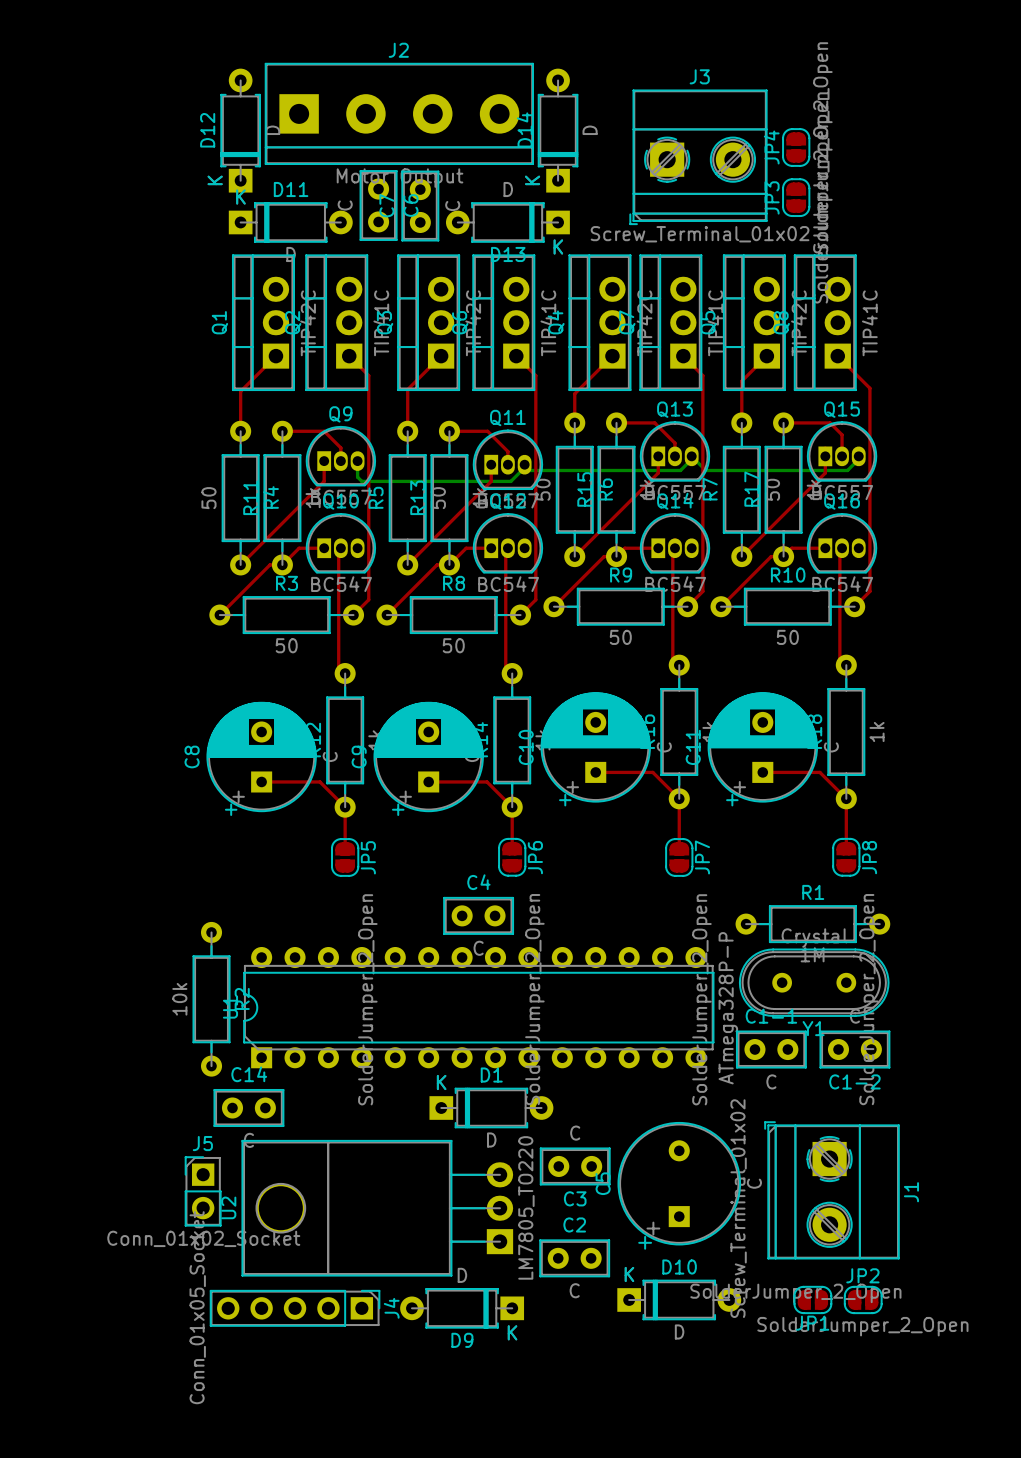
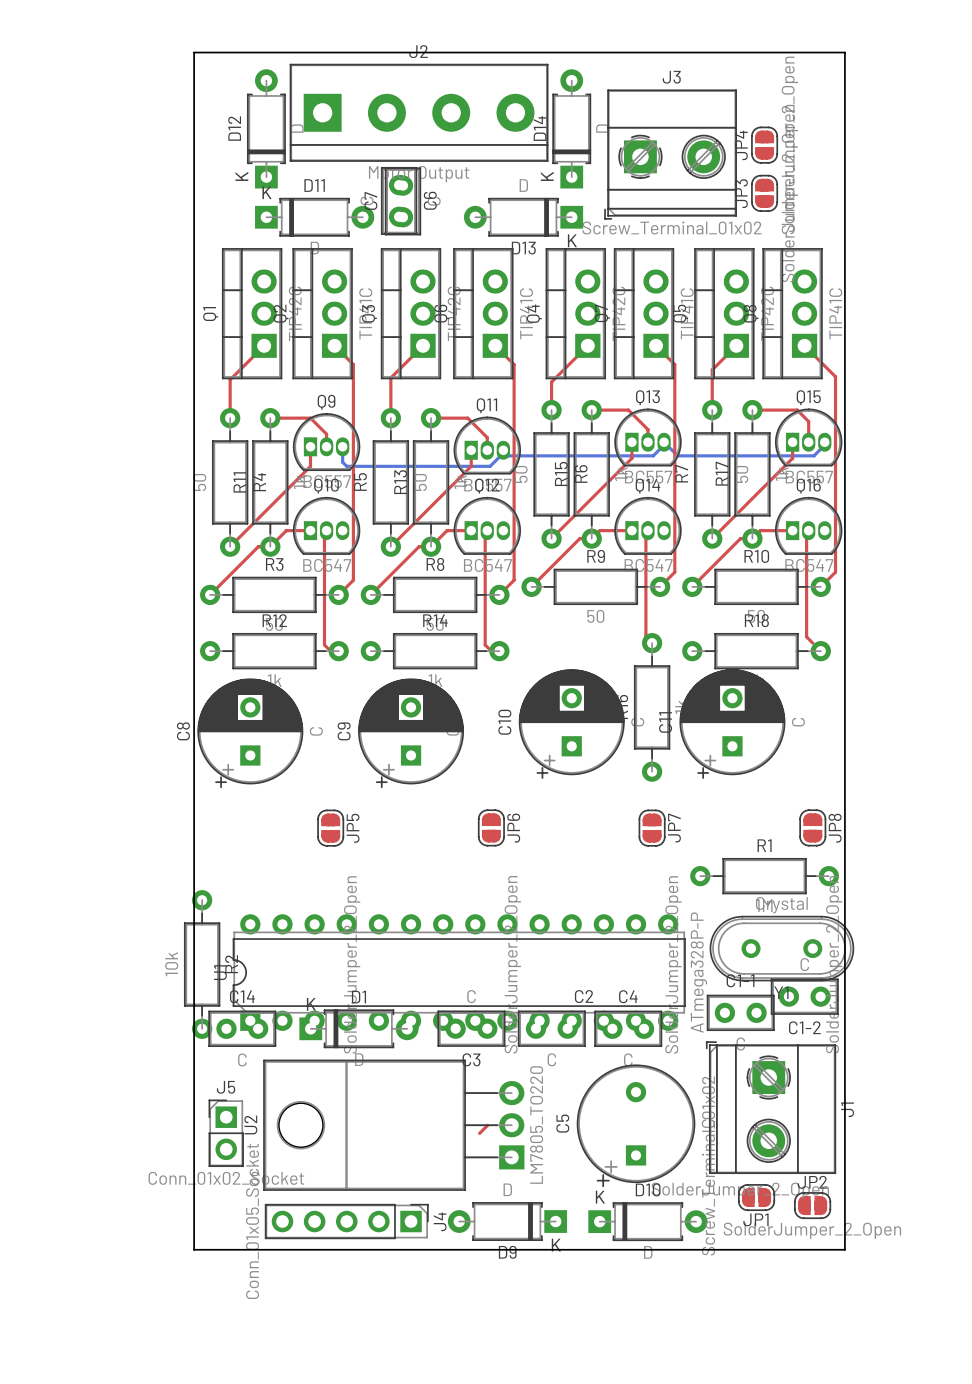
board edge: none -> (194, 52) (844, 52) (844, 1249) (194, 1249) (194, 52)
J2 position: (399, 113) -> (419, 112)
D12 position: (240, 130) -> (266, 128)
D14 position: (558, 130) -> (571, 128)
C6 position: (378, 205) -> (399, 200)
D11 position: (290, 222) -> (314, 217)
D13 position: (507, 222) -> (523, 217)
R18 rotation: 0° (846, 731) -> 90° clockwise (756, 651)
R12 rotation: 0° (345, 740) -> 90° clockwise (274, 651)
R14 rotation: 0° (512, 740) -> 90° clockwise (435, 651)
top track: (595, 772) (652, 772) (679, 798) (679, 848) -> none
top track: (762, 772) (819, 772) (846, 798) (846, 848) -> none
top track: (261, 781) (319, 781) (345, 807) (345, 848) -> none
top track: (428, 781) (487, 781) (512, 807) (512, 848) -> none
C4 position: (478, 915) -> (628, 1028)
R1 position: (812, 924) -> (764, 876)
C1-2 position: (854, 1049) -> (804, 996)
C14 position: (248, 1108) -> (242, 1028)
D1 position: (491, 1108) -> (358, 1028)
C3 position: (575, 1166) -> (471, 1028)
C5 position: (679, 1185) -> (636, 1125)
J1 position: (831, 1190) -> (771, 1107)
J5 position: (203, 1191) -> (226, 1133)
U2 position: (377, 1208) -> (393, 1125)
C2 name position: C2 (574, 1224) -> C2 (584, 996)
C2 position: (574, 1258) -> (551, 1028)
D10 position: (679, 1299) -> (647, 1221)
JP1 position: (812, 1299) -> (756, 1197)
JP2 position: (863, 1299) -> (812, 1205)
J4 position: (295, 1308) -> (346, 1221)
D9 position: (462, 1308) -> (507, 1221)

